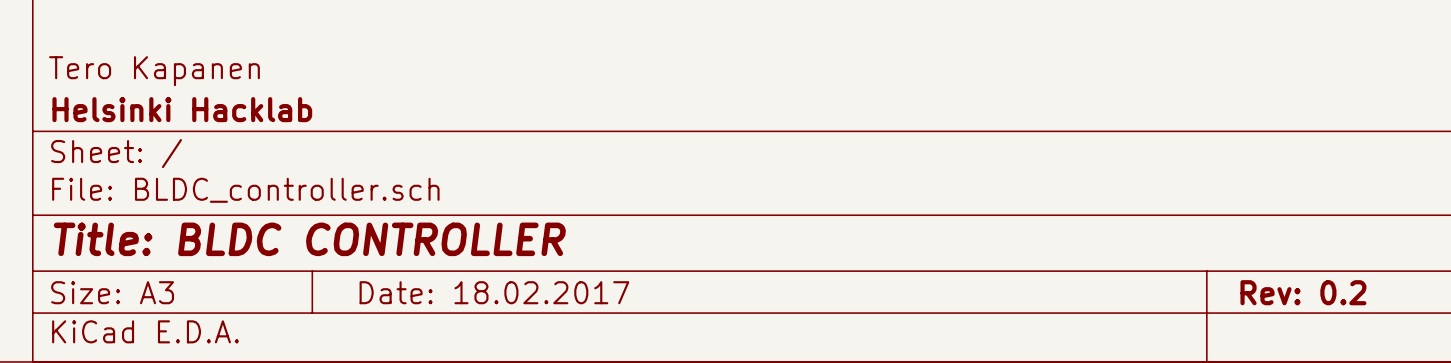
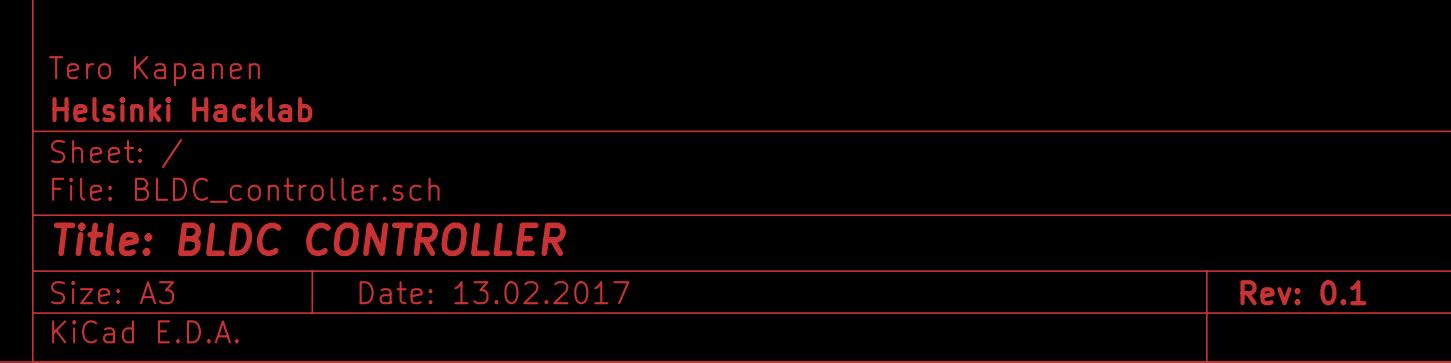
title block: Date: 18.02.2017 (494, 292) -> Date: 13.02.2017 (494, 292)
title block: Rev: 0.2 (1303, 292) -> Rev: 0.1 (1303, 292)

